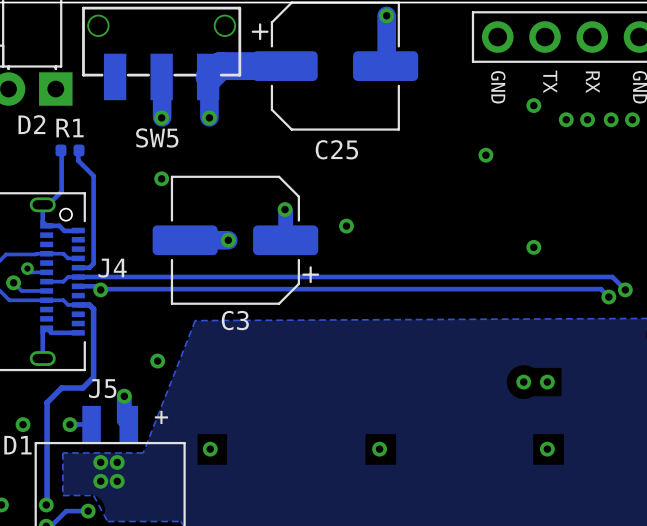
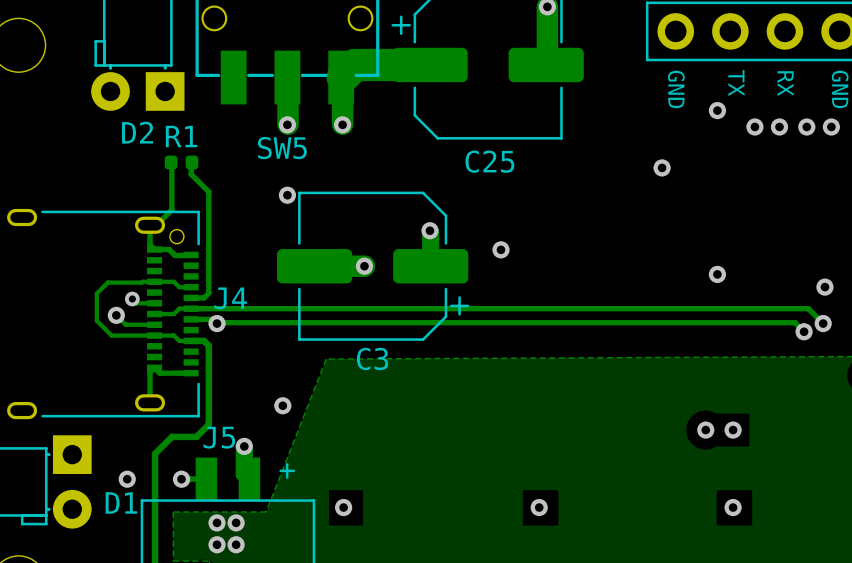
via: none -> (824, 287)

